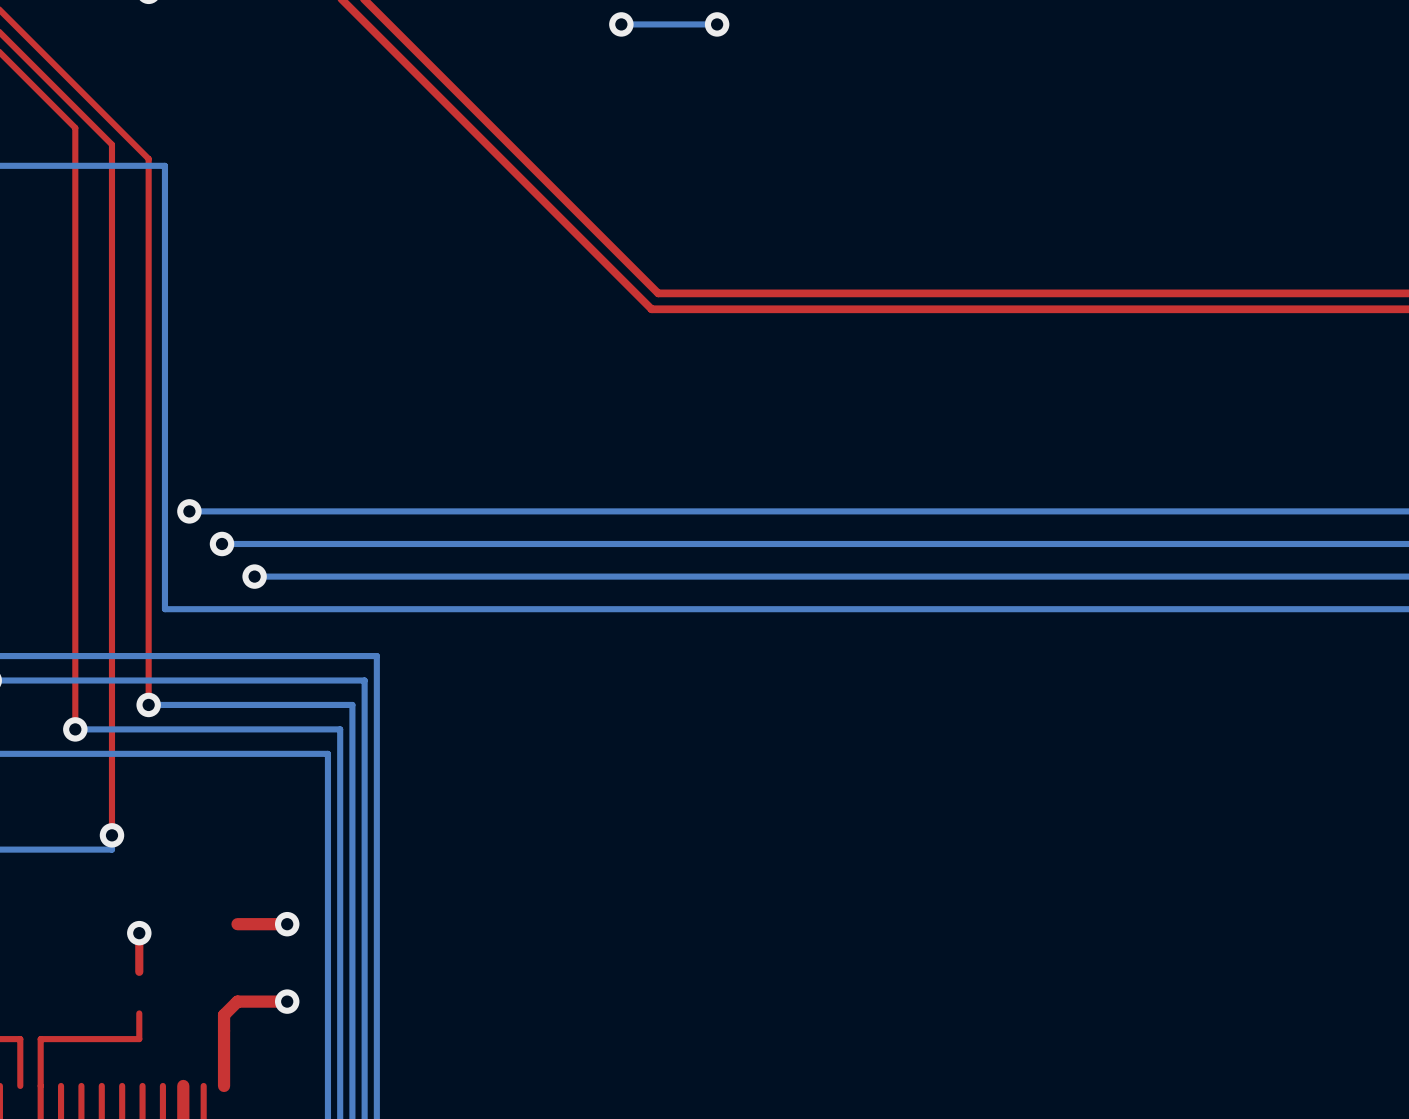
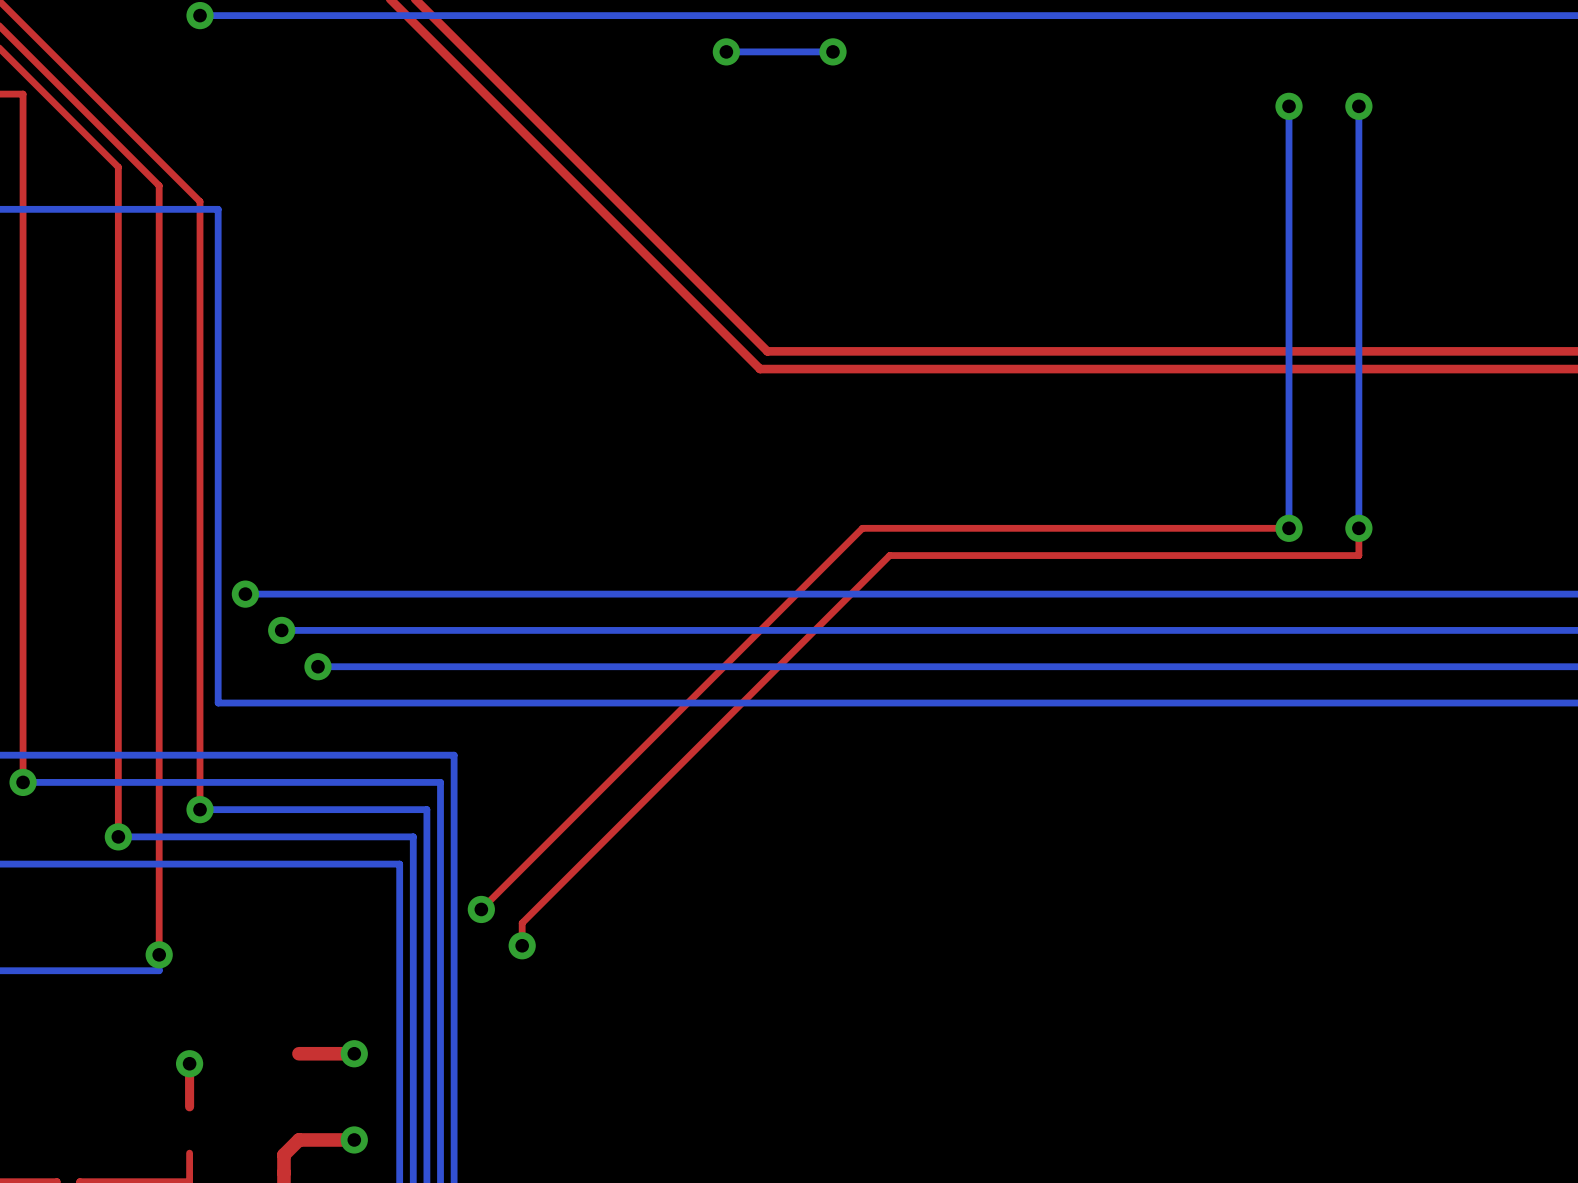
bottom track: none -> (1289, 106) (1289, 528)
via: none -> (1289, 106)
bottom track: none -> (1358, 106) (1358, 528)
via: none -> (1358, 106)
top track: none -> (1289, 528) (862, 528) (481, 909)
via: none -> (1289, 528)
top track: none -> (1358, 528) (1358, 555) (889, 555) (522, 923) (522, 945)
via: none -> (1358, 528)
via: none -> (481, 909)
via: none -> (522, 945)

